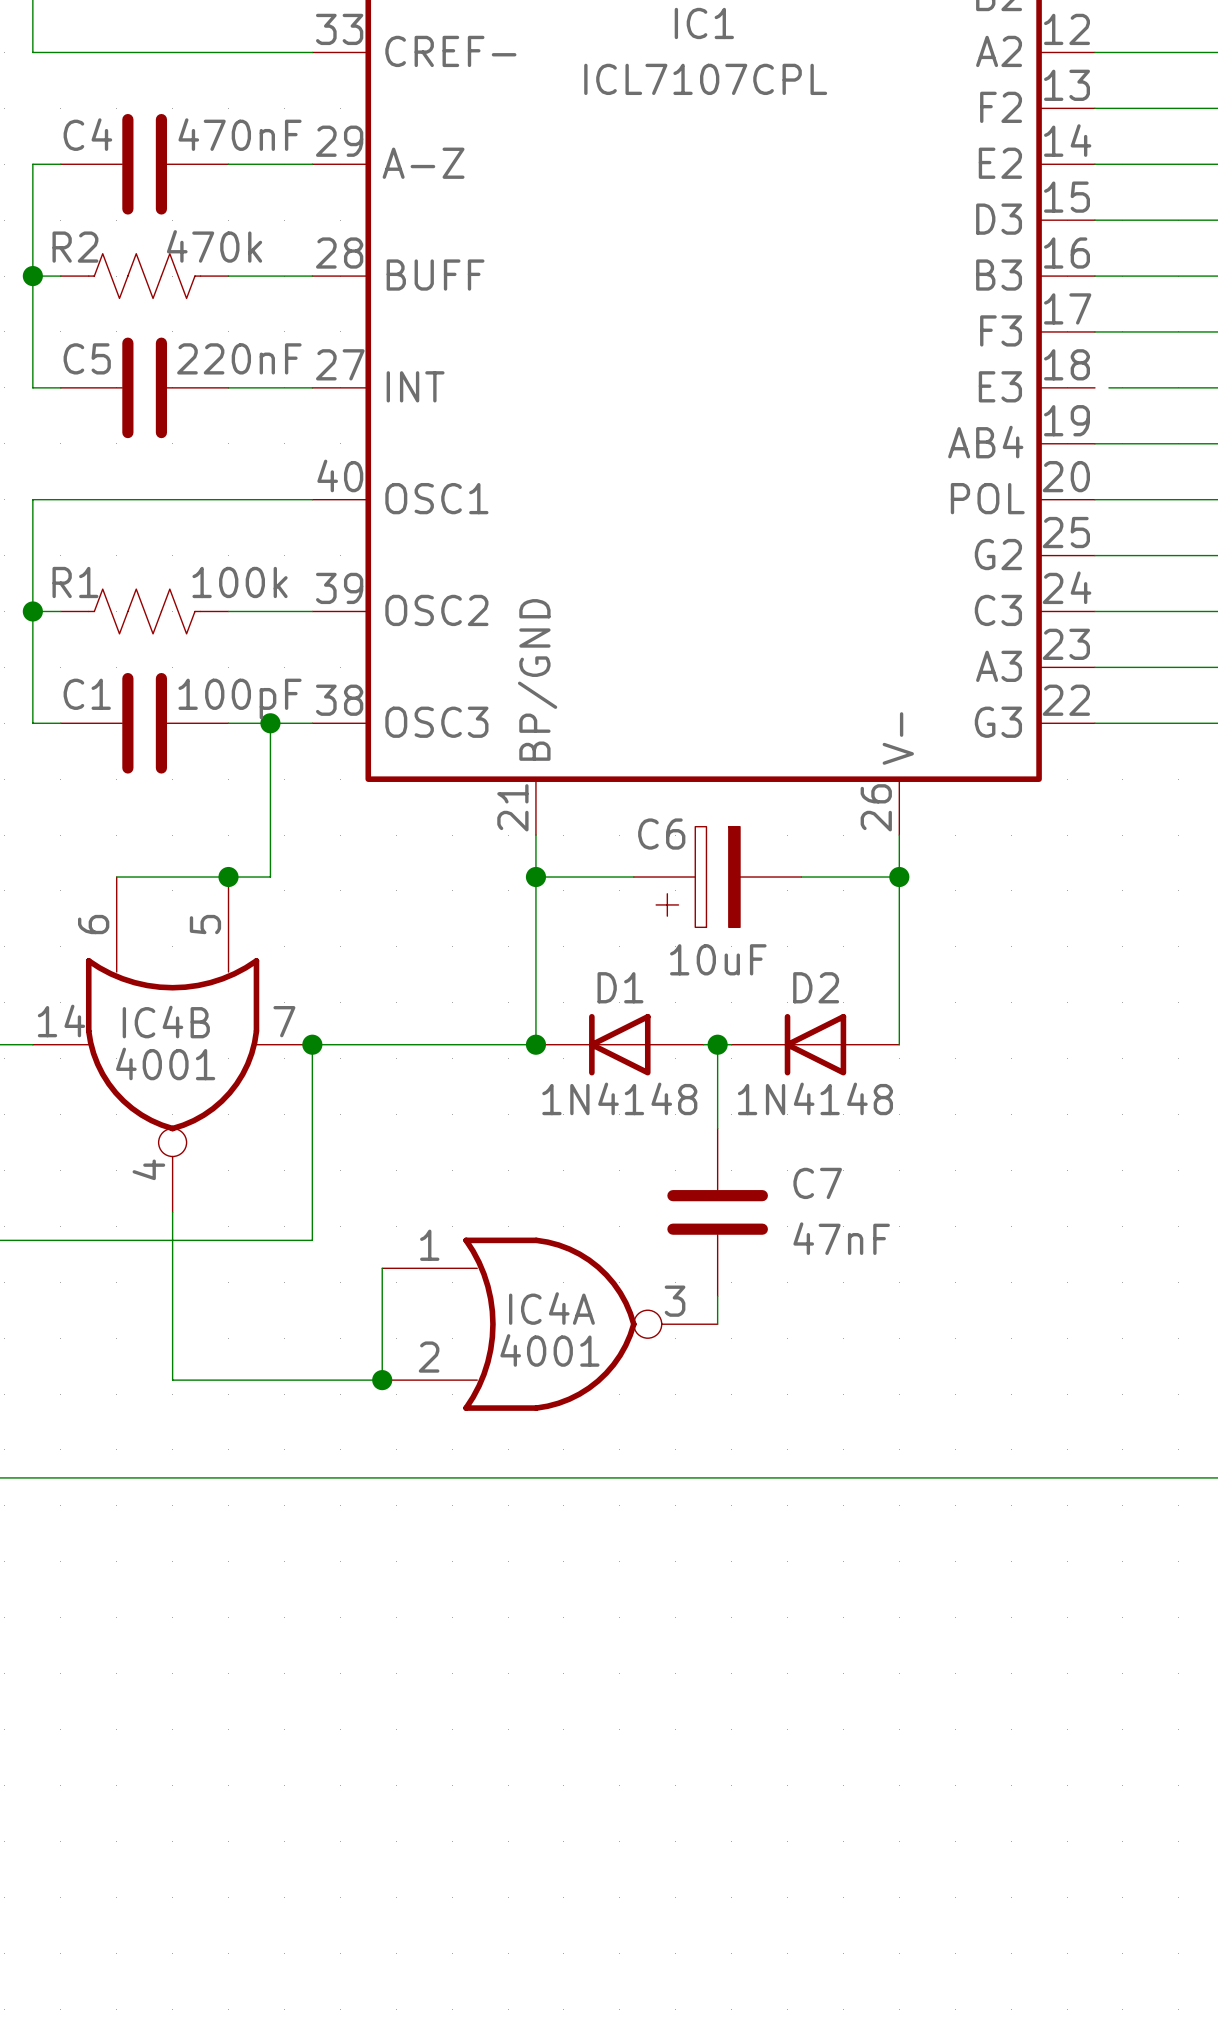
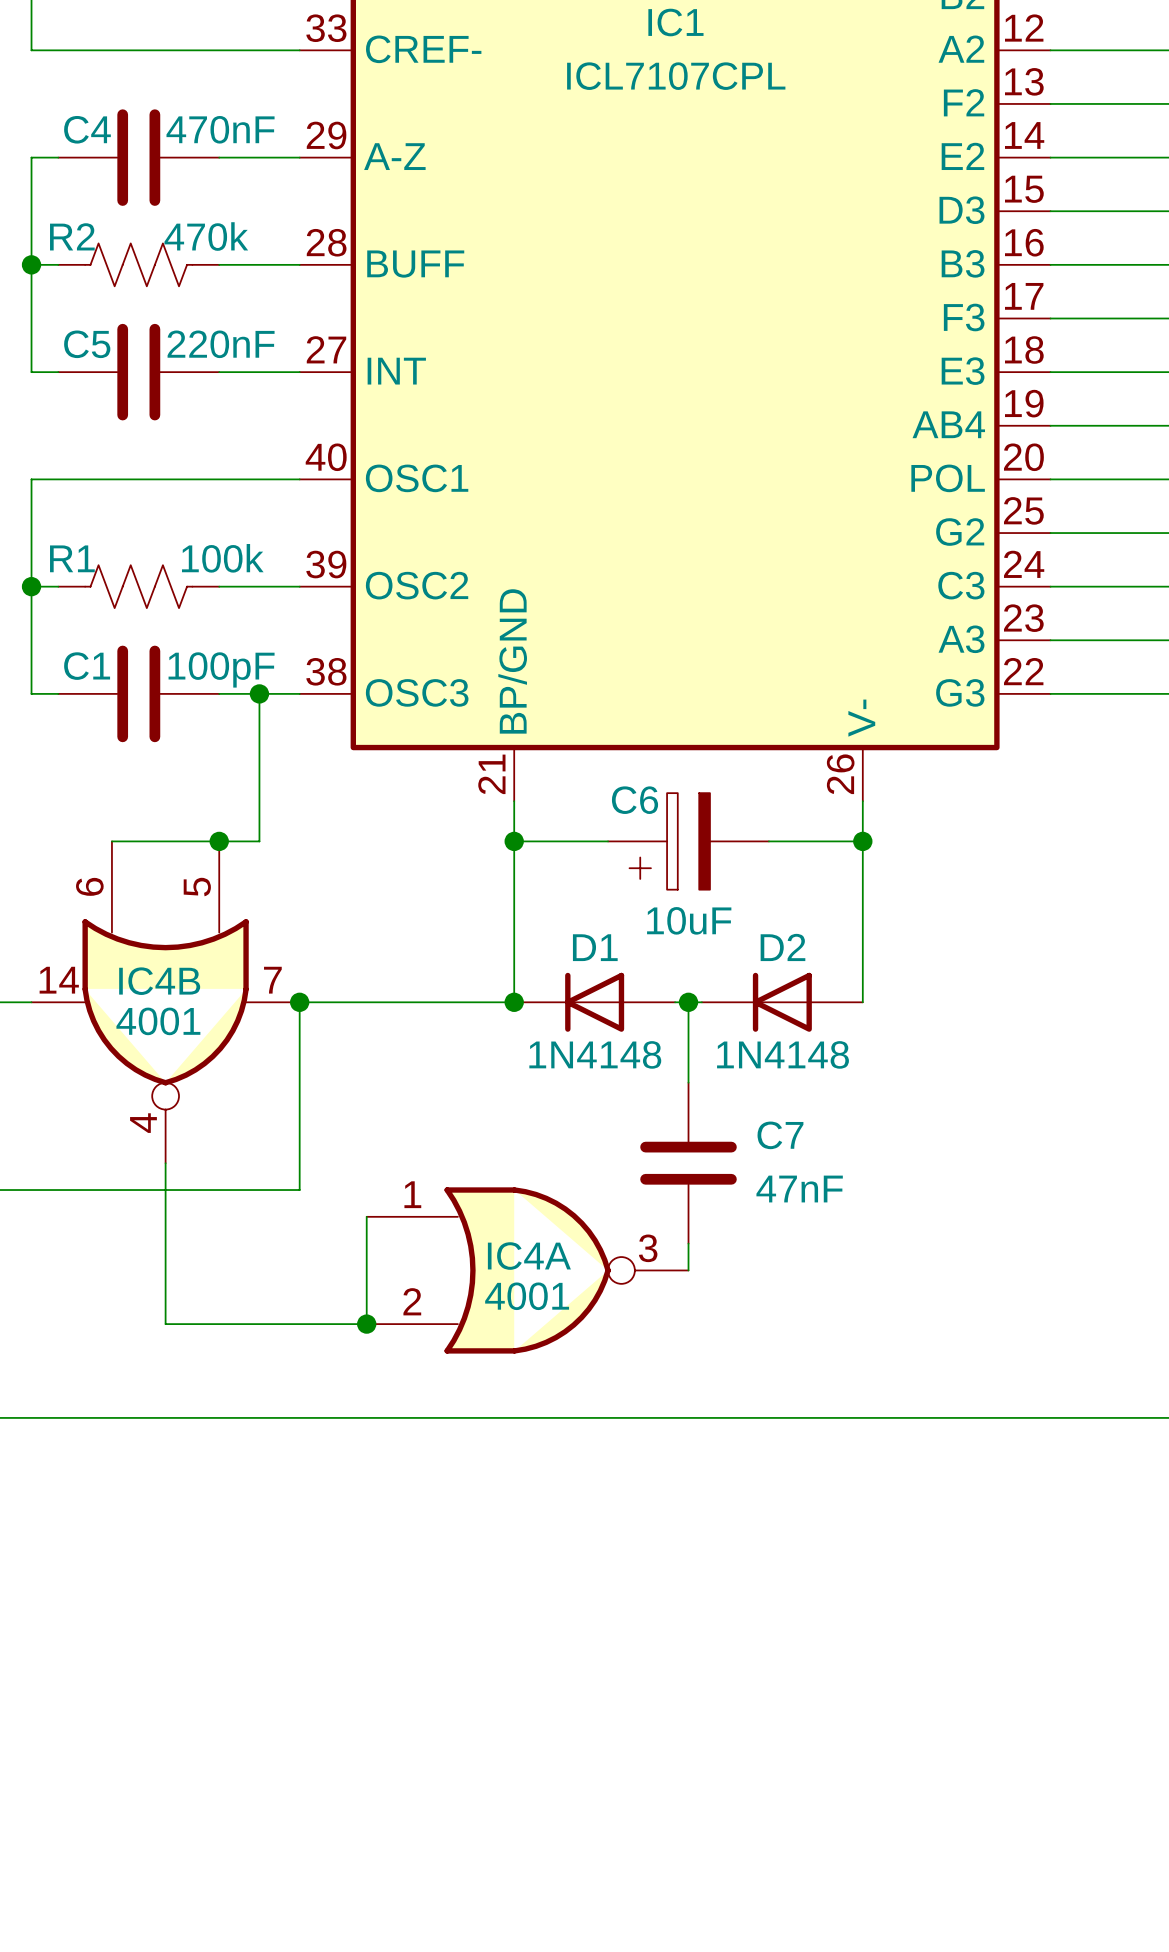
wire: none -> (1050, 372) (1063, 372)

